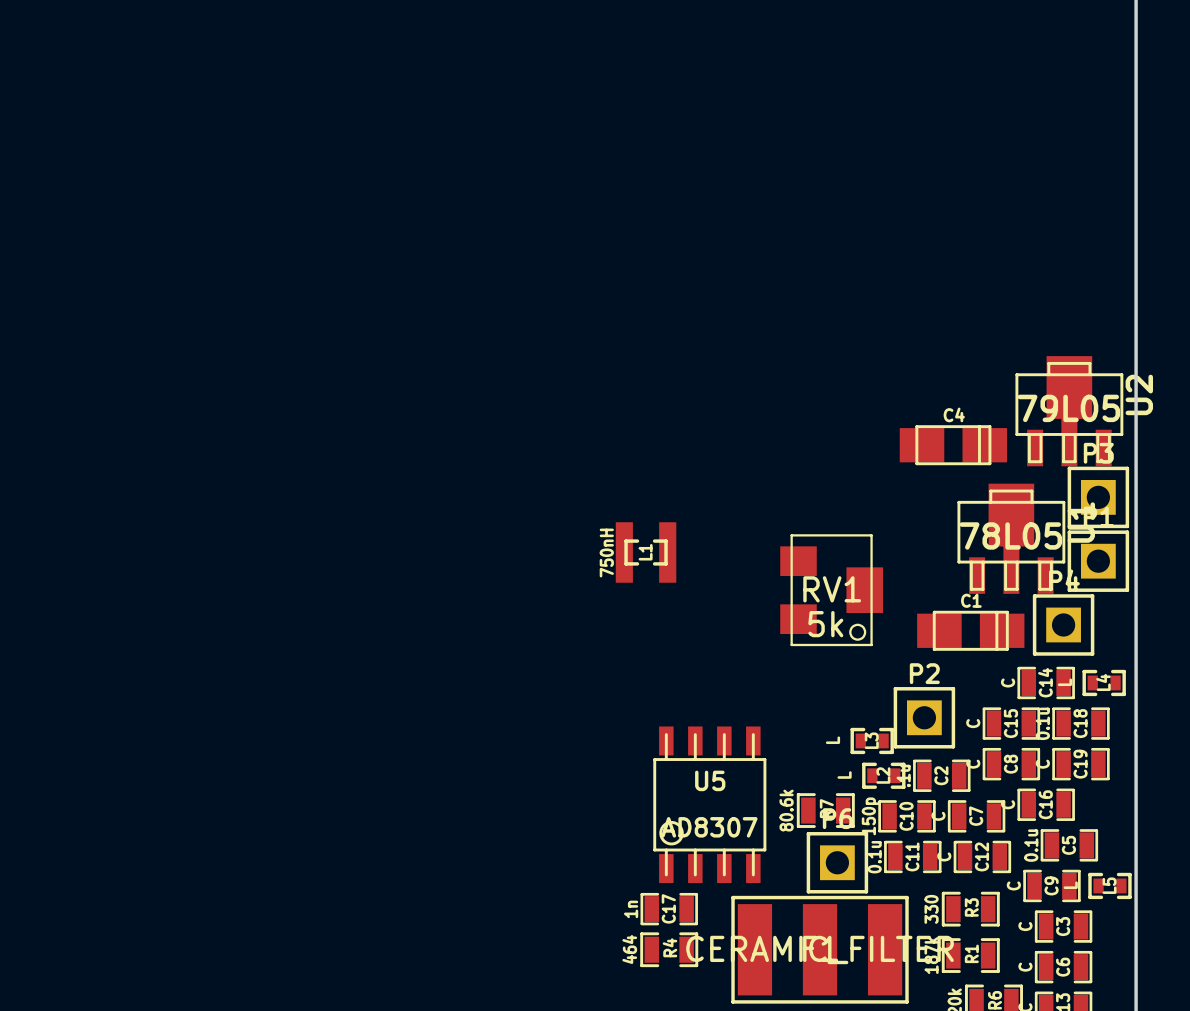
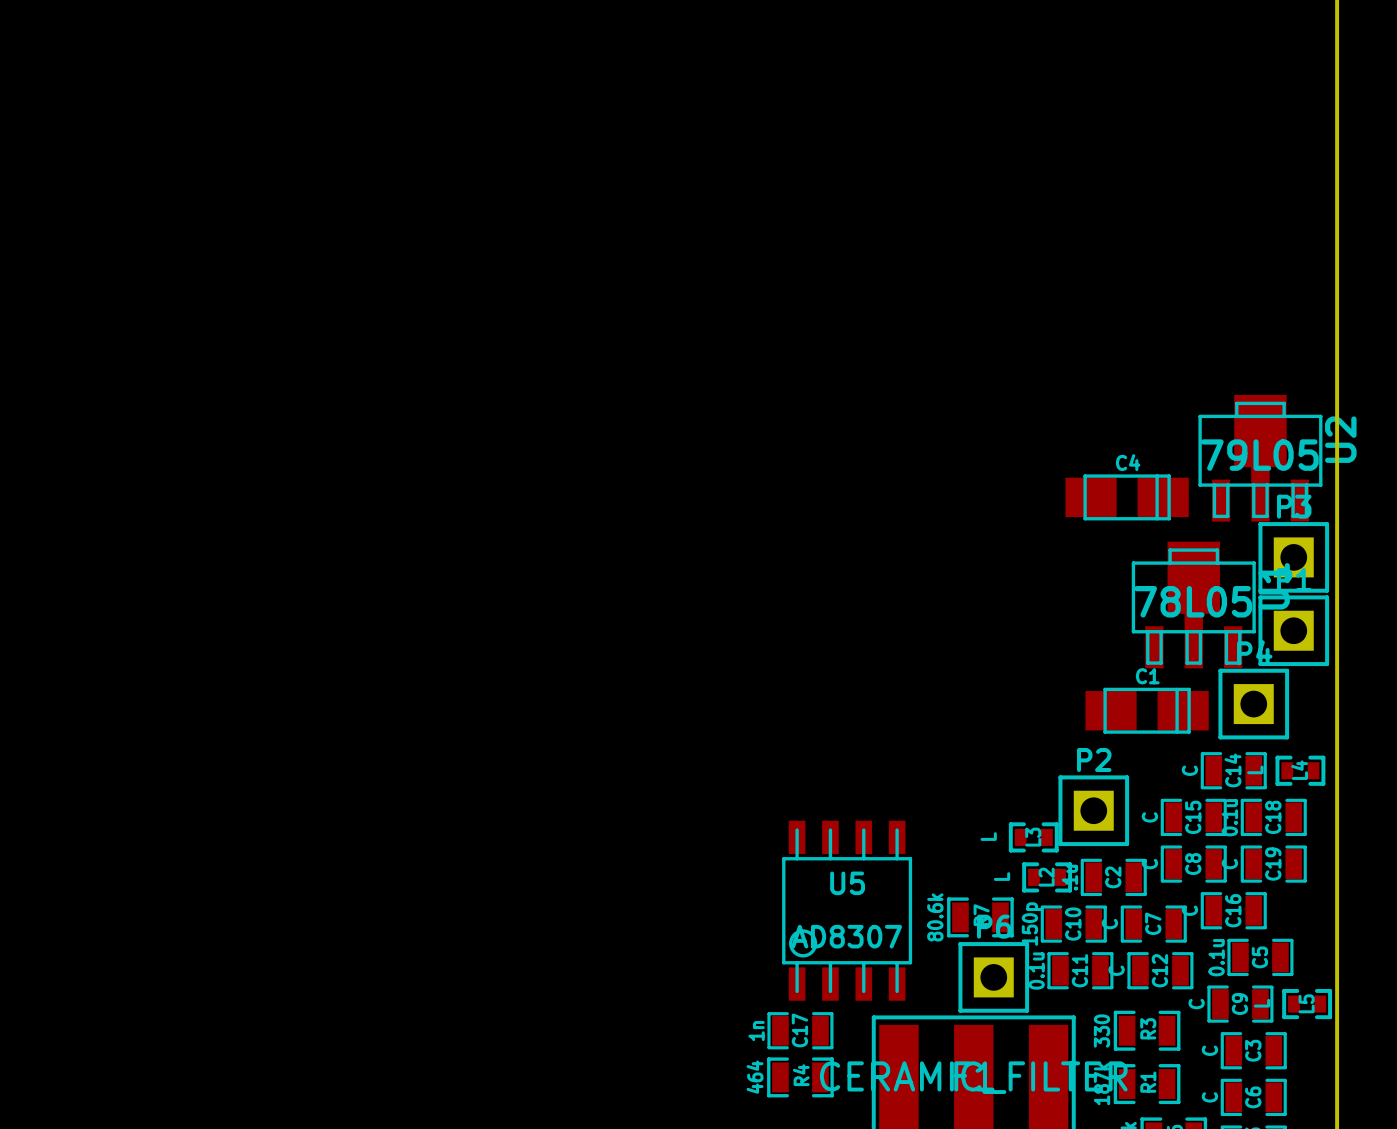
L1: 750nH (646, 552) -> none
RV1: 5k (831, 590) -> none

